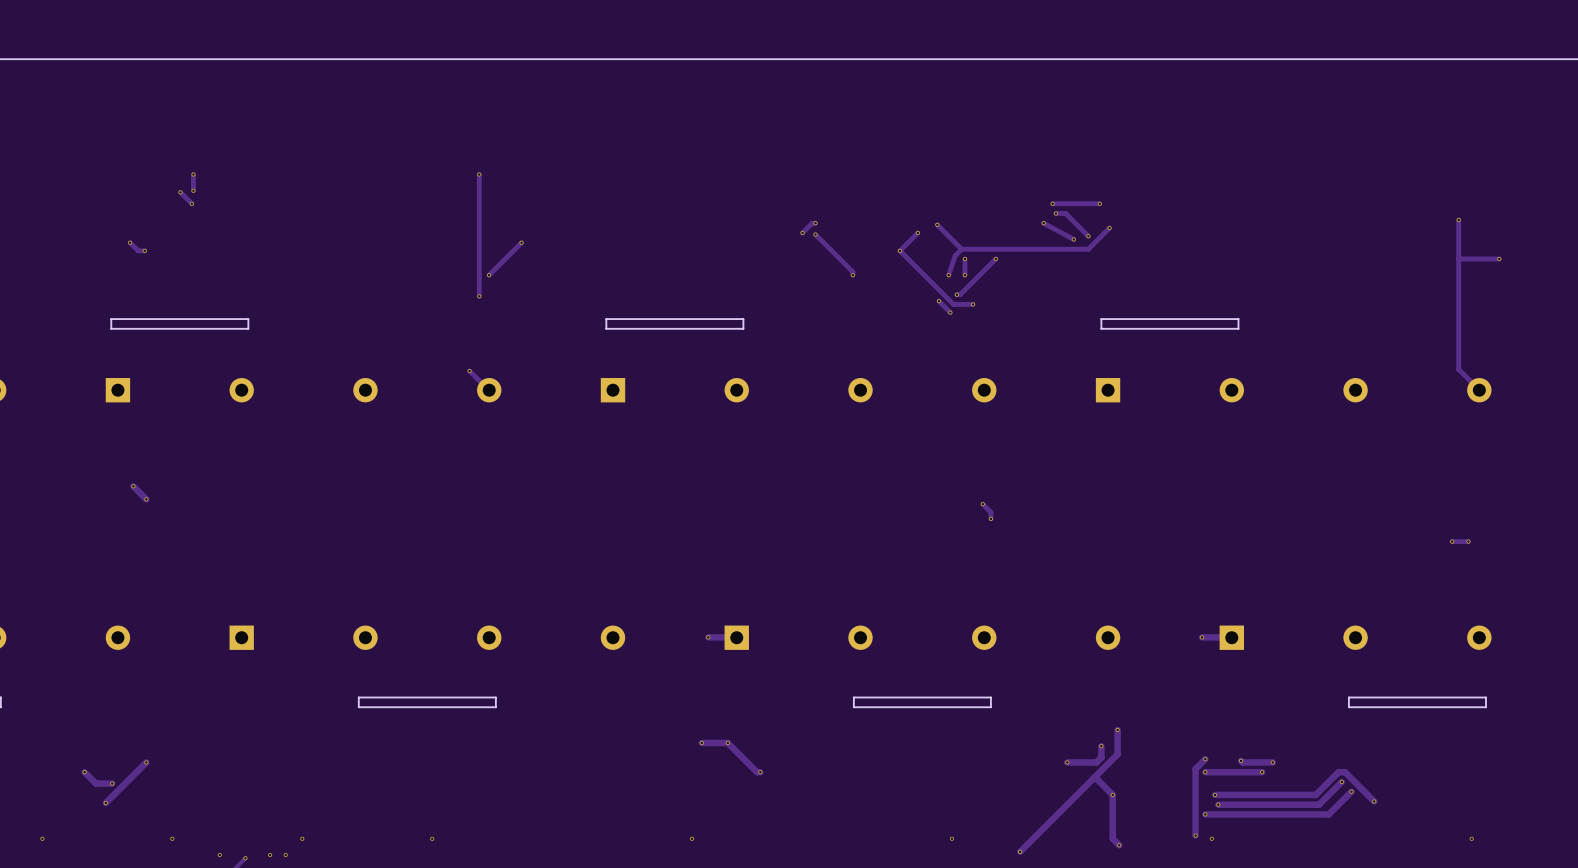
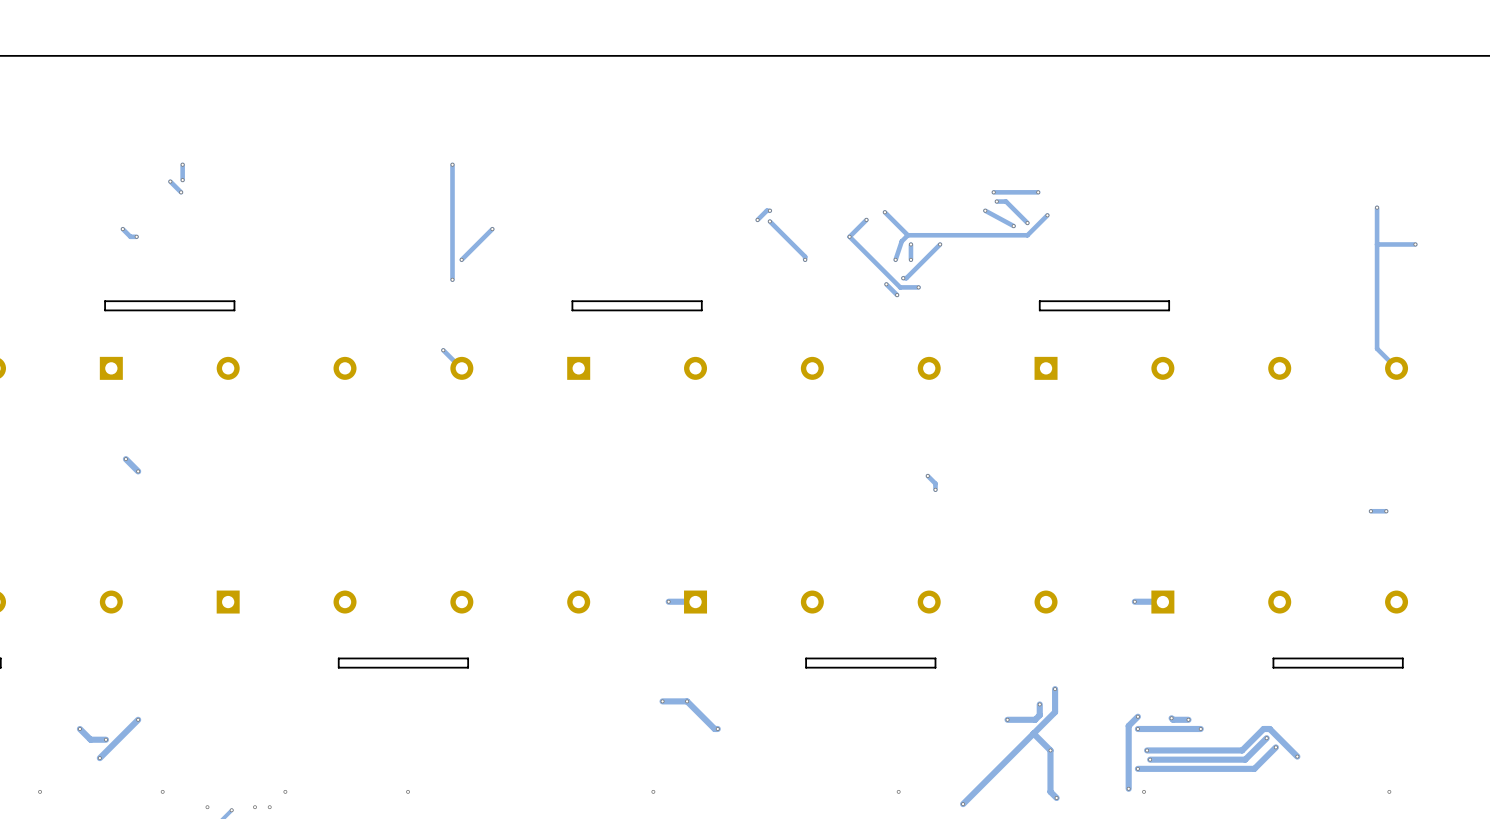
via: none -> (1188, 719)
track: (1272, 762) (1258, 762) -> none
via: (1272, 762) -> none
via: (1262, 772) -> none
track: none -> (1200, 728) (1191, 728)
via: none -> (1200, 728)

